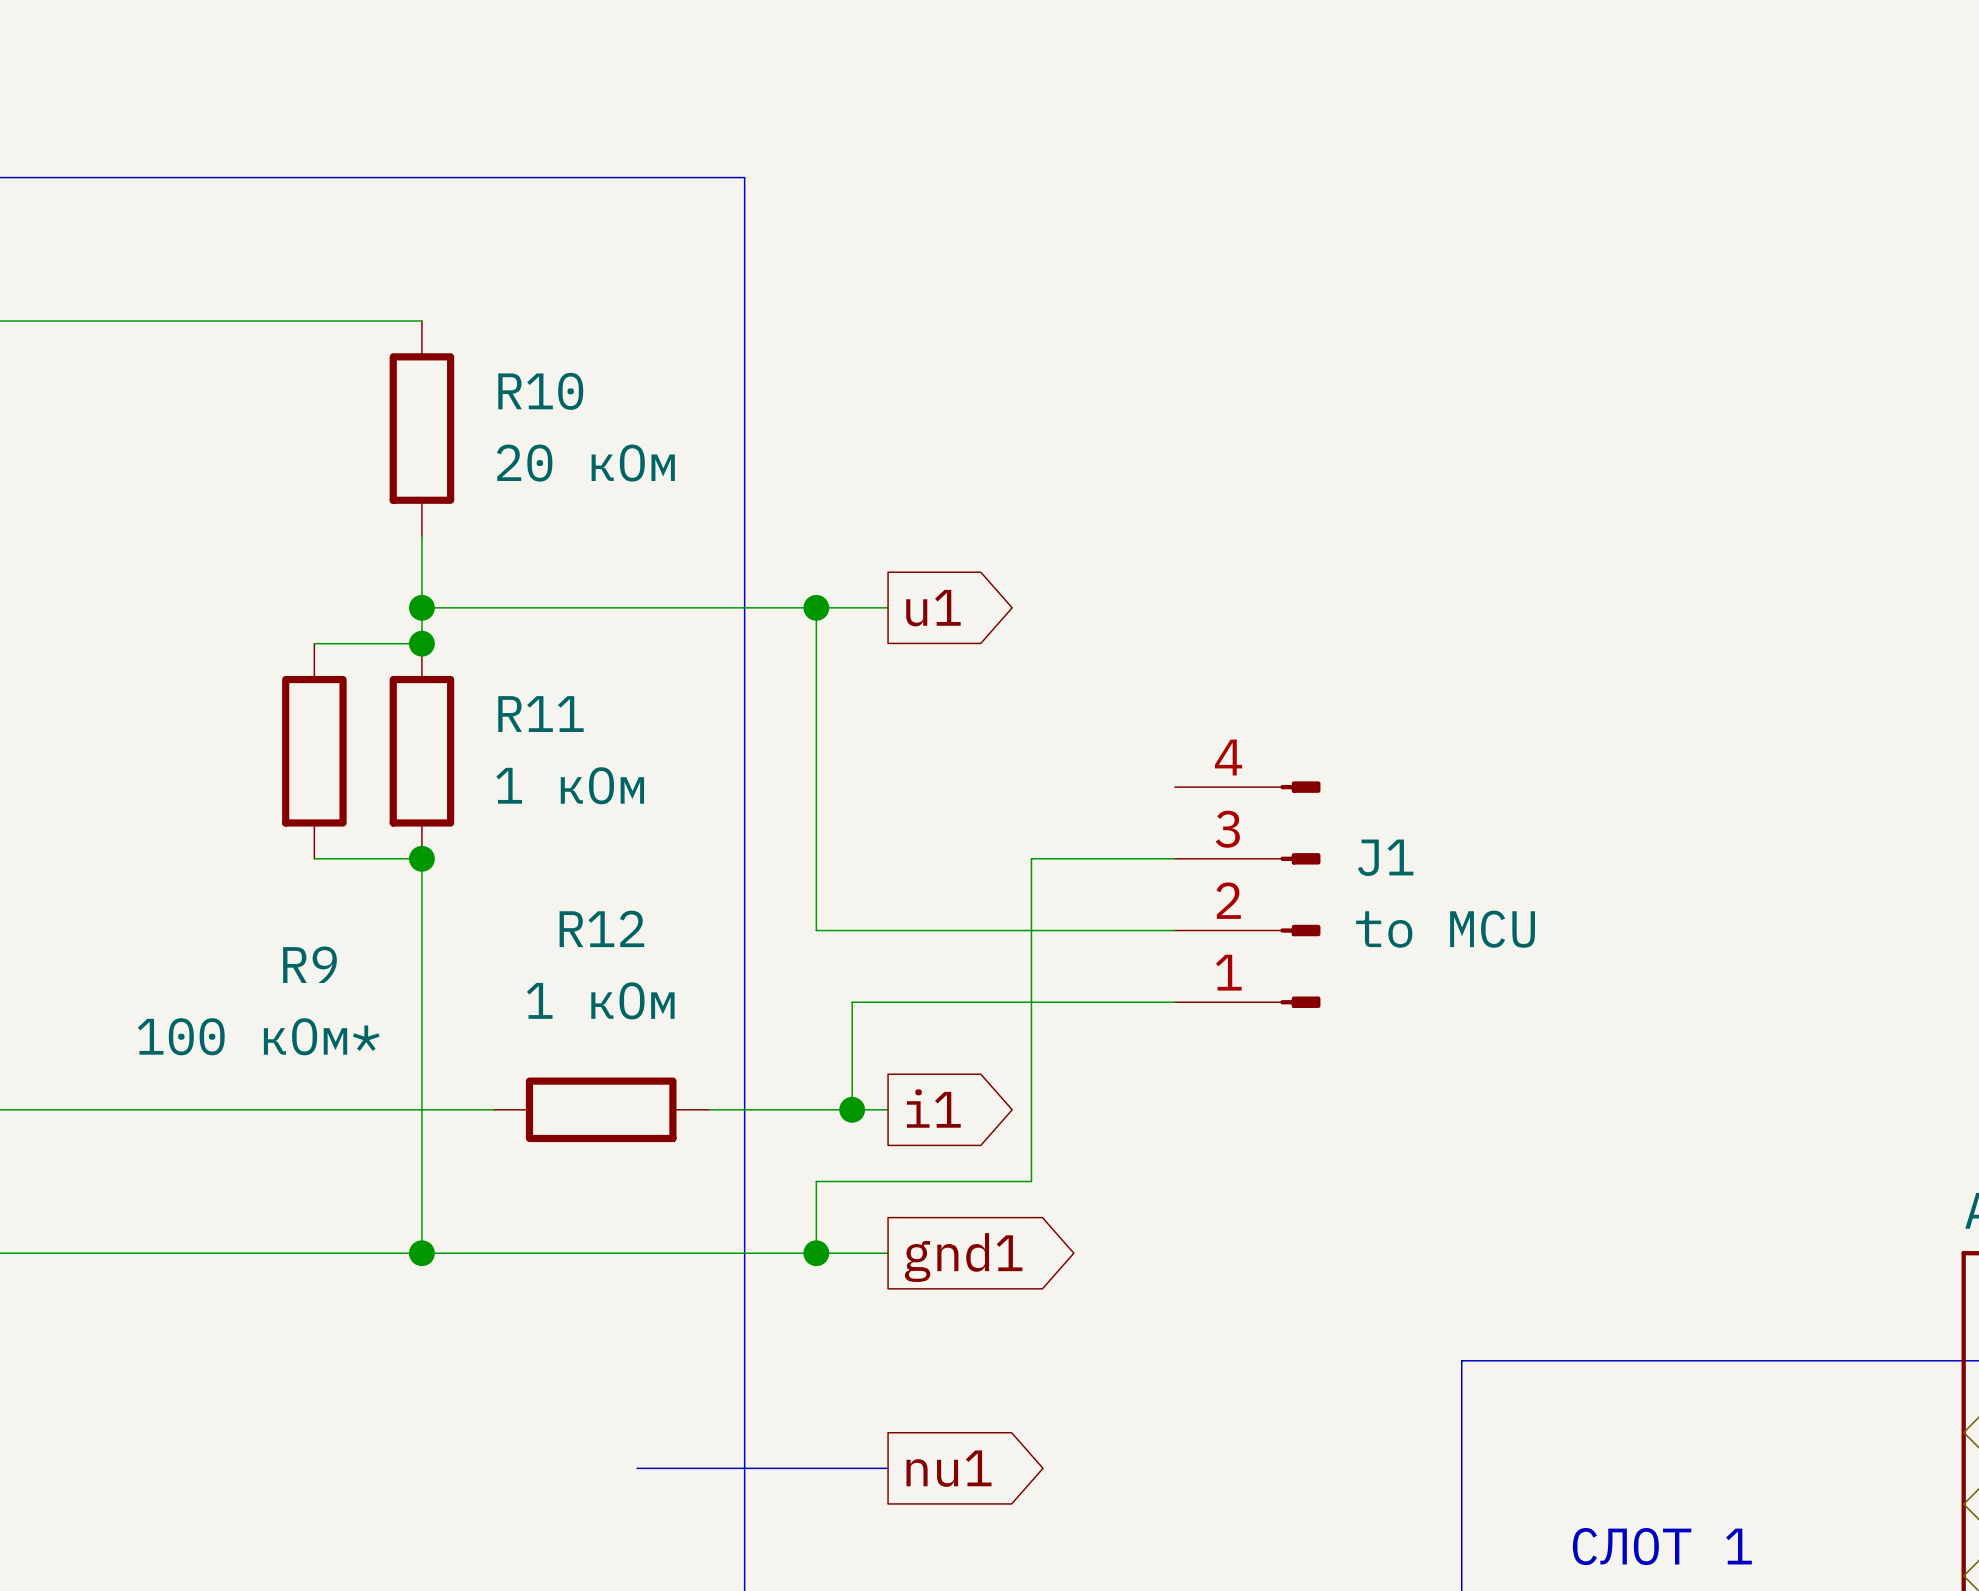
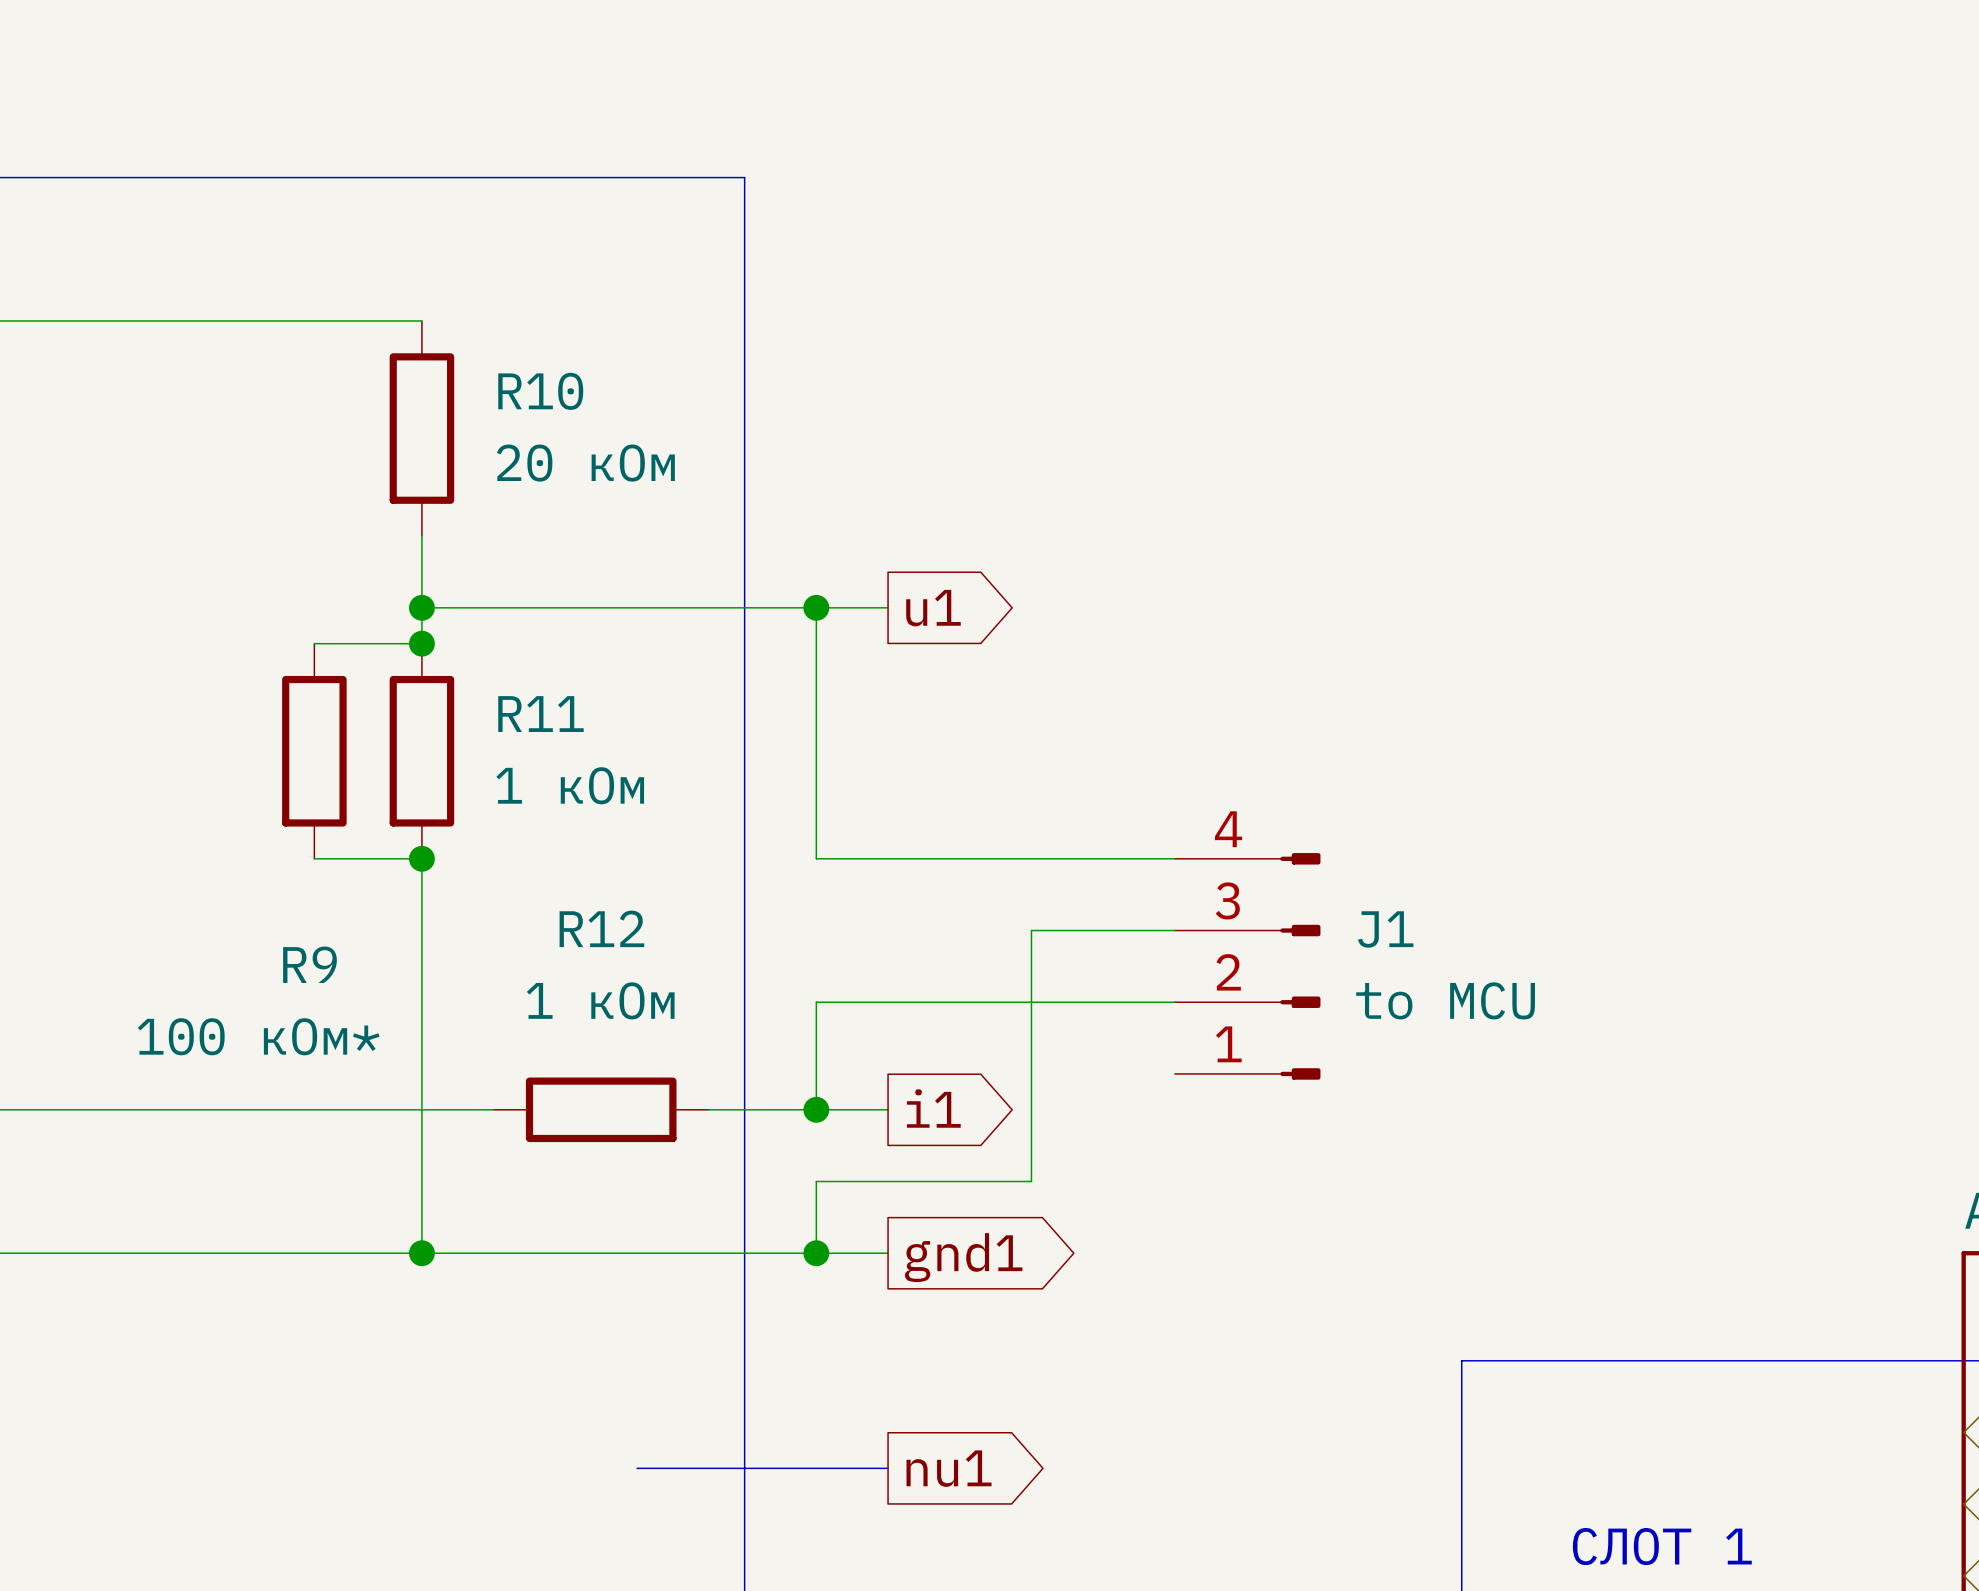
wire: (816, 858) (816, 930) (1031, 930) (1031, 858) -> (816, 858) (1031, 858)
J1 position: (1247, 894) -> (1247, 966)
wire: (852, 1002) (852, 1109) -> (852, 1002) (816, 1002) (816, 1109)
junction position: (852, 1109) -> (816, 1109)

